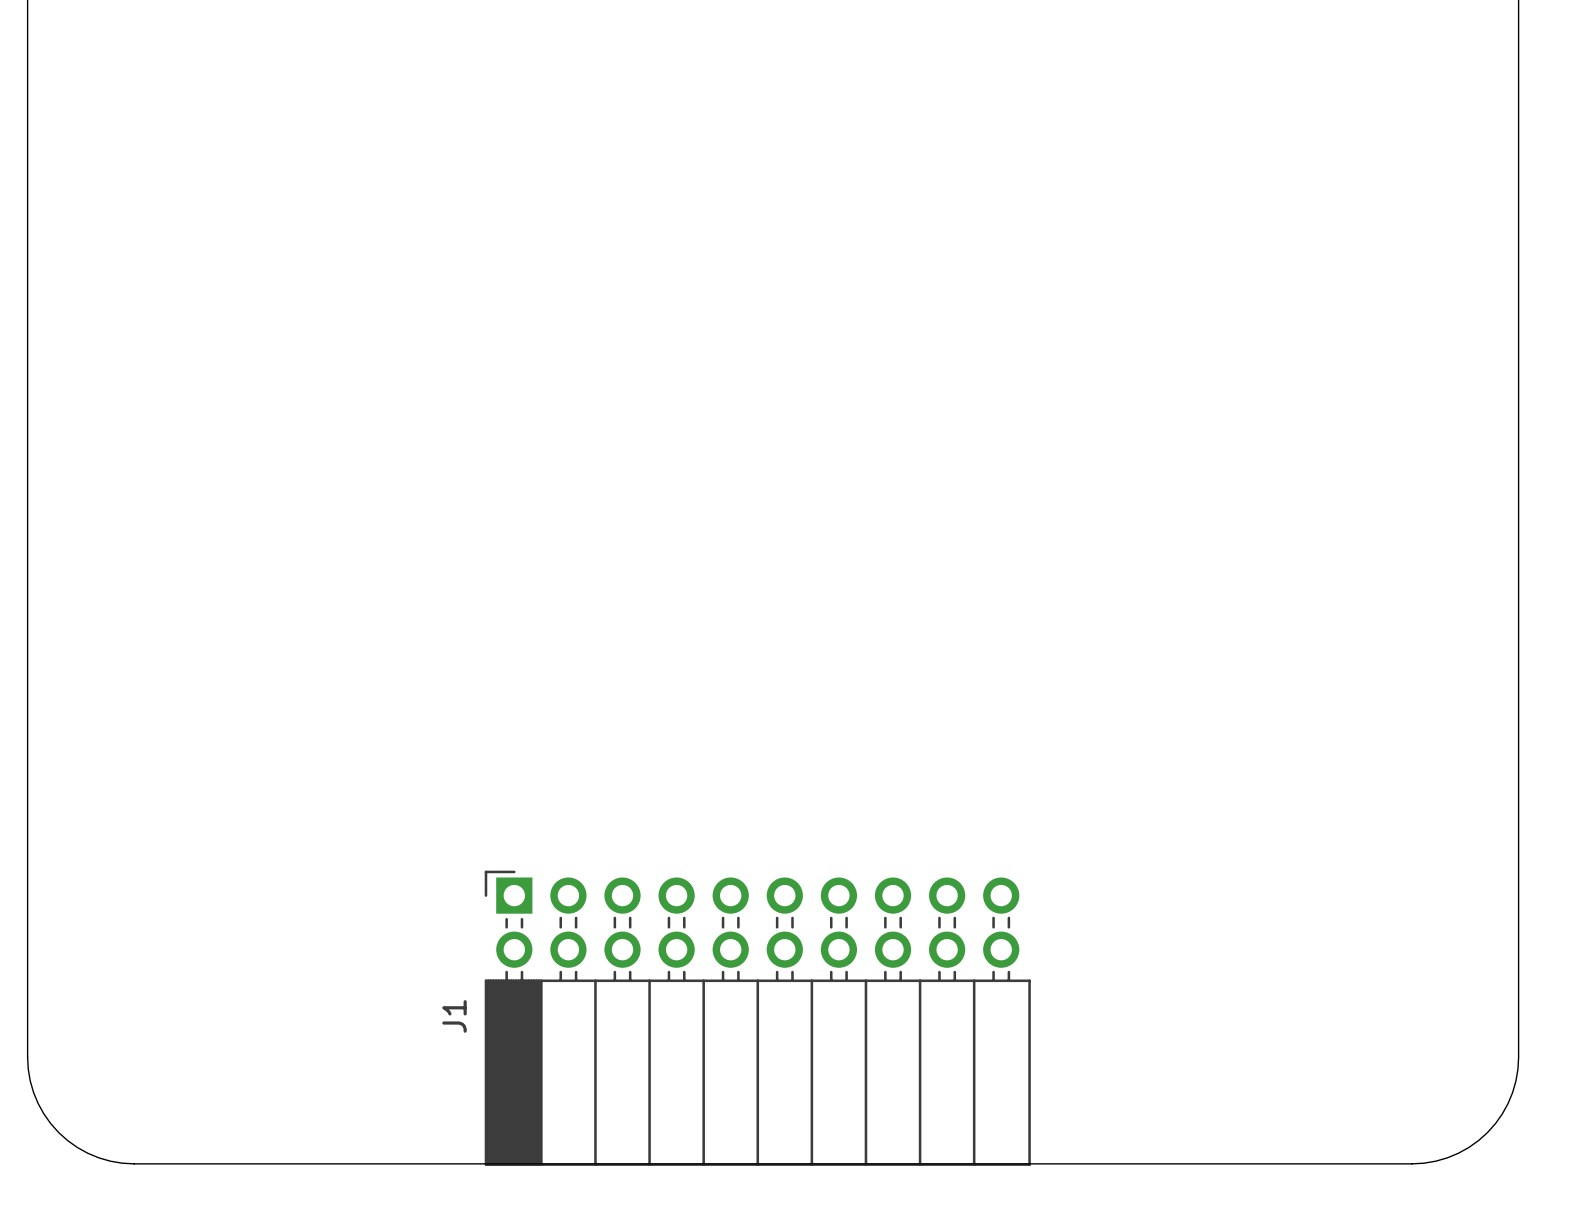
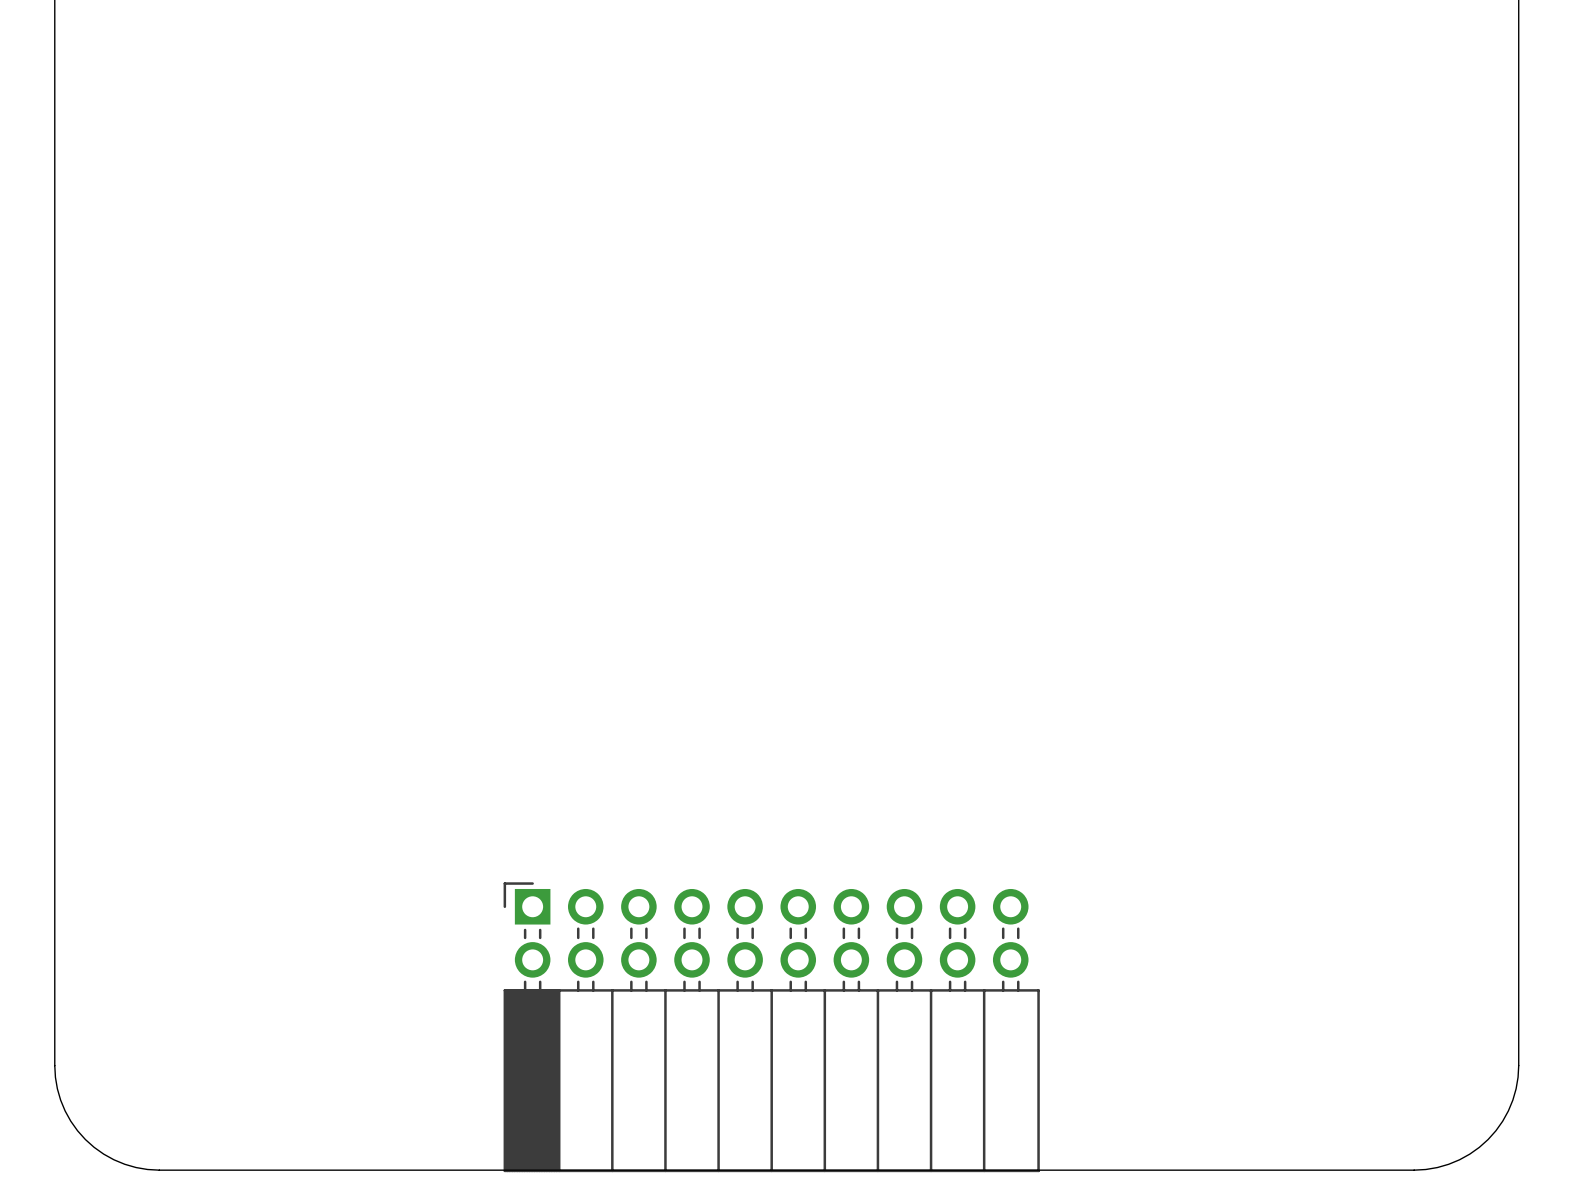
J1 name: J1 (454, 1016) -> none

